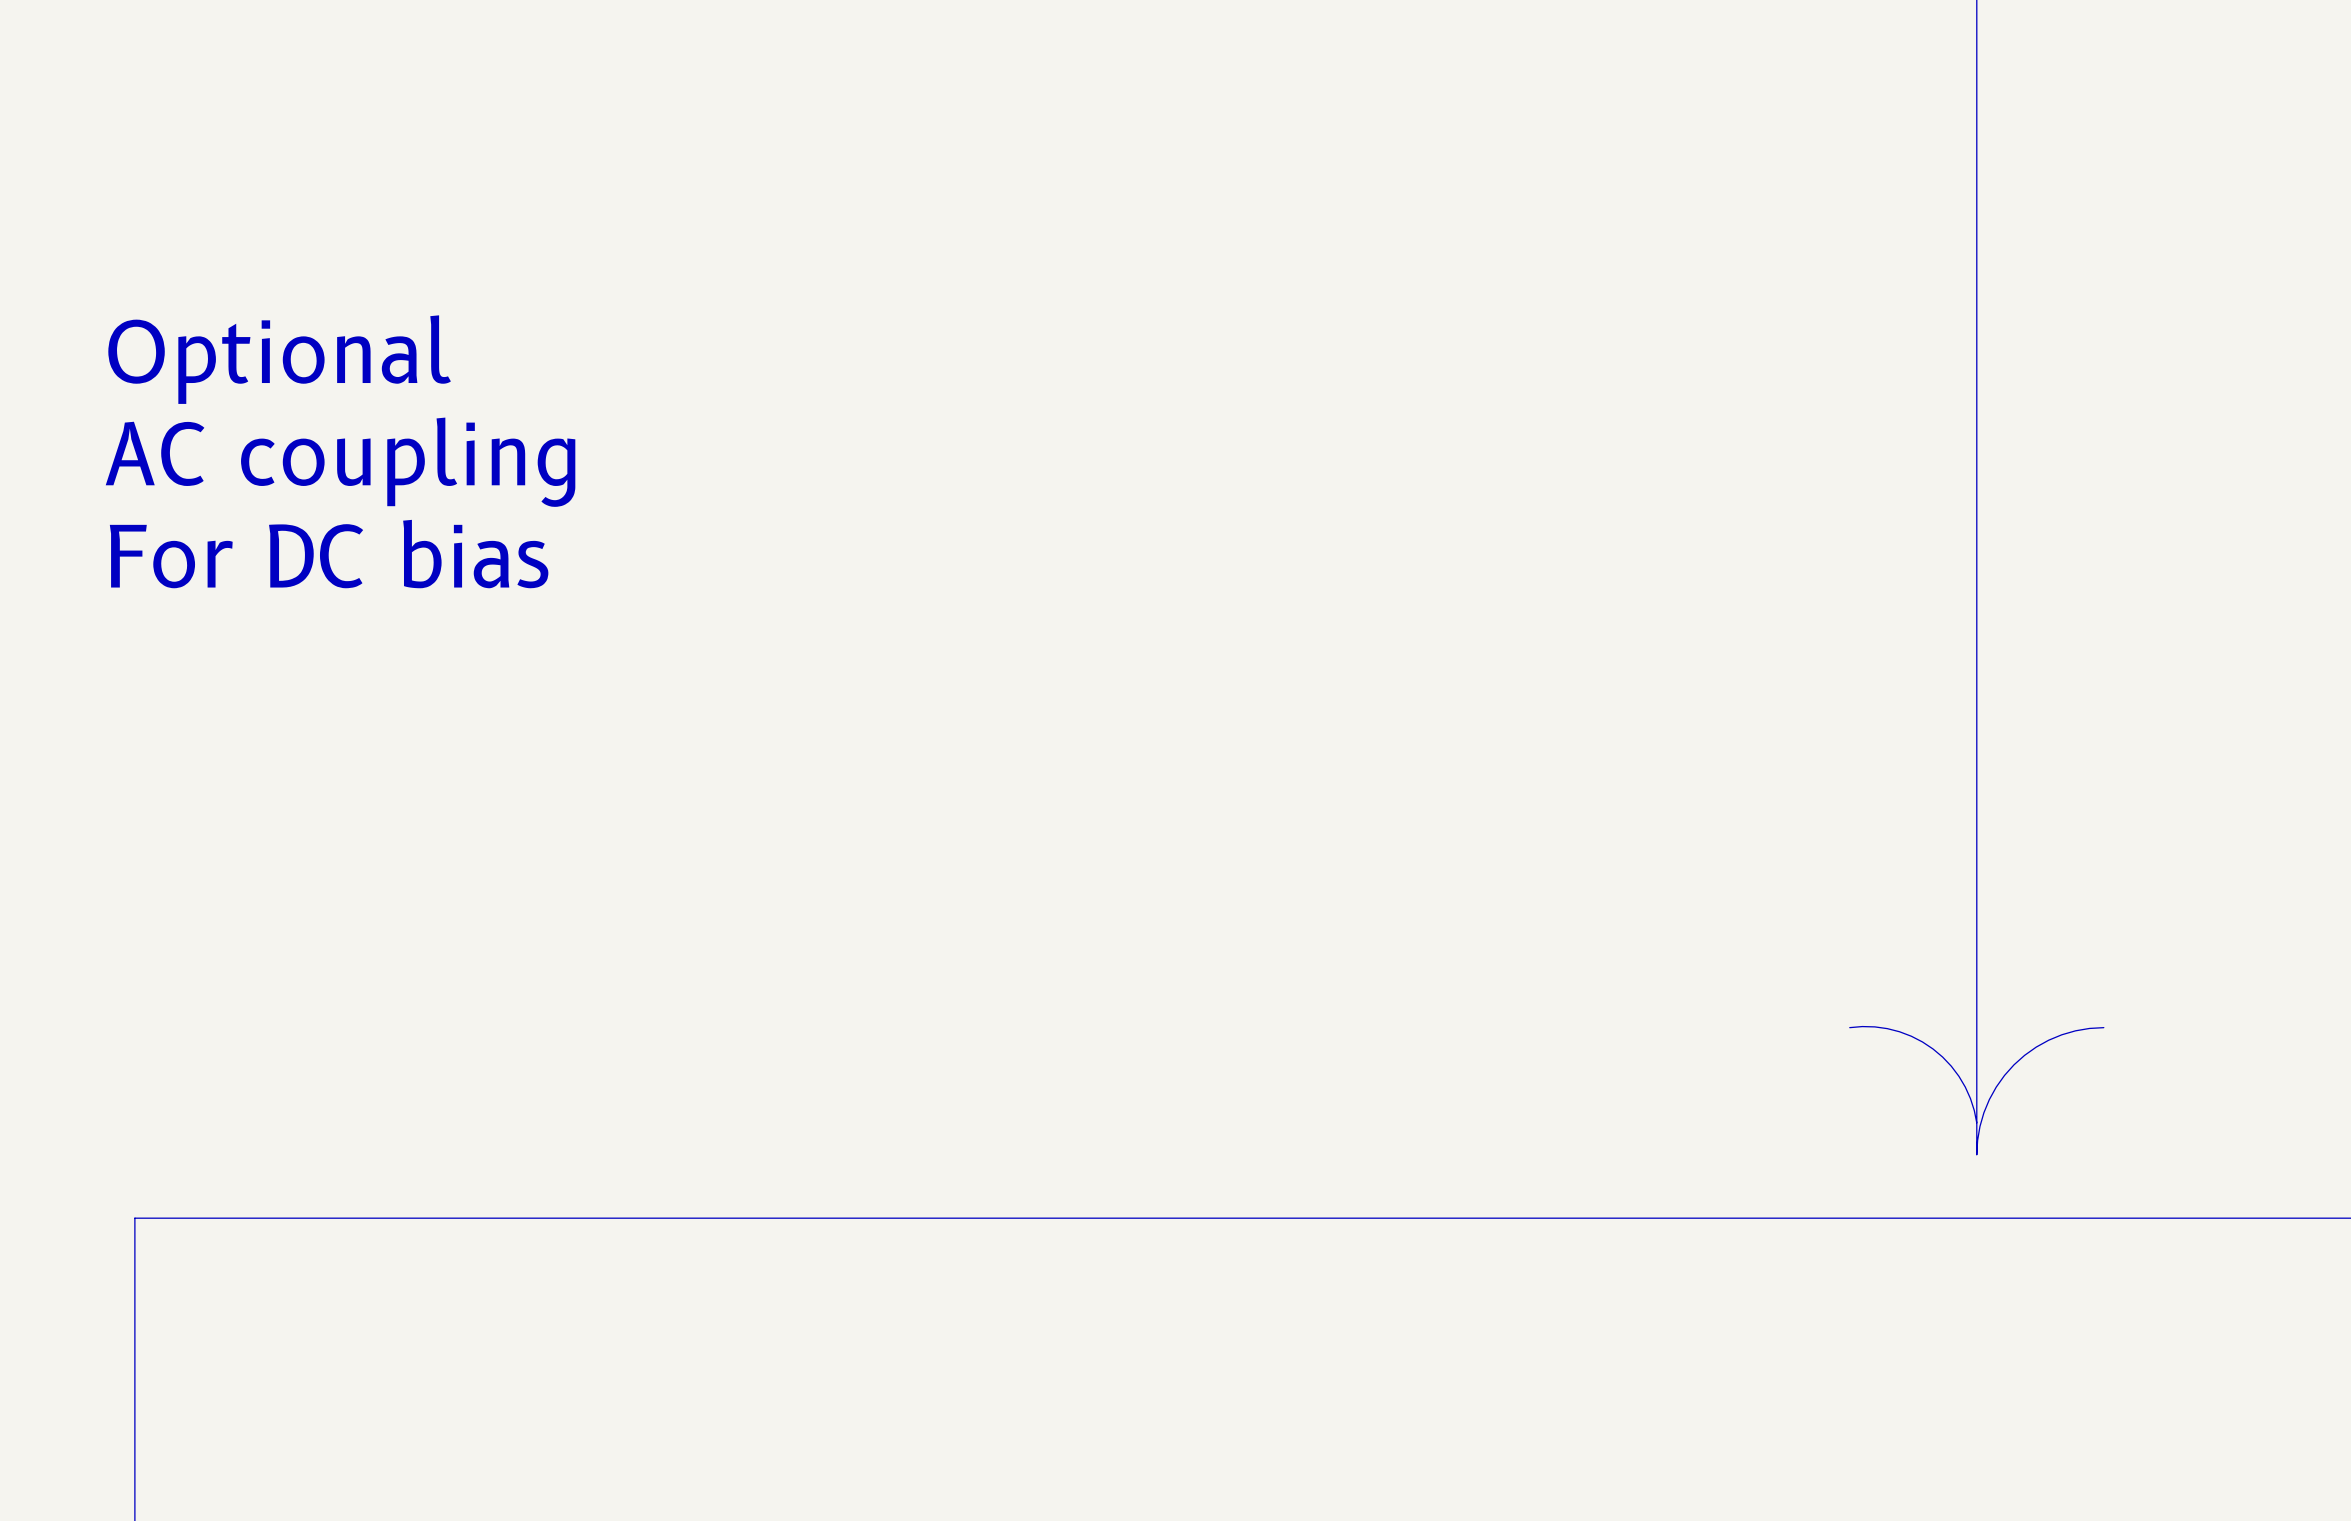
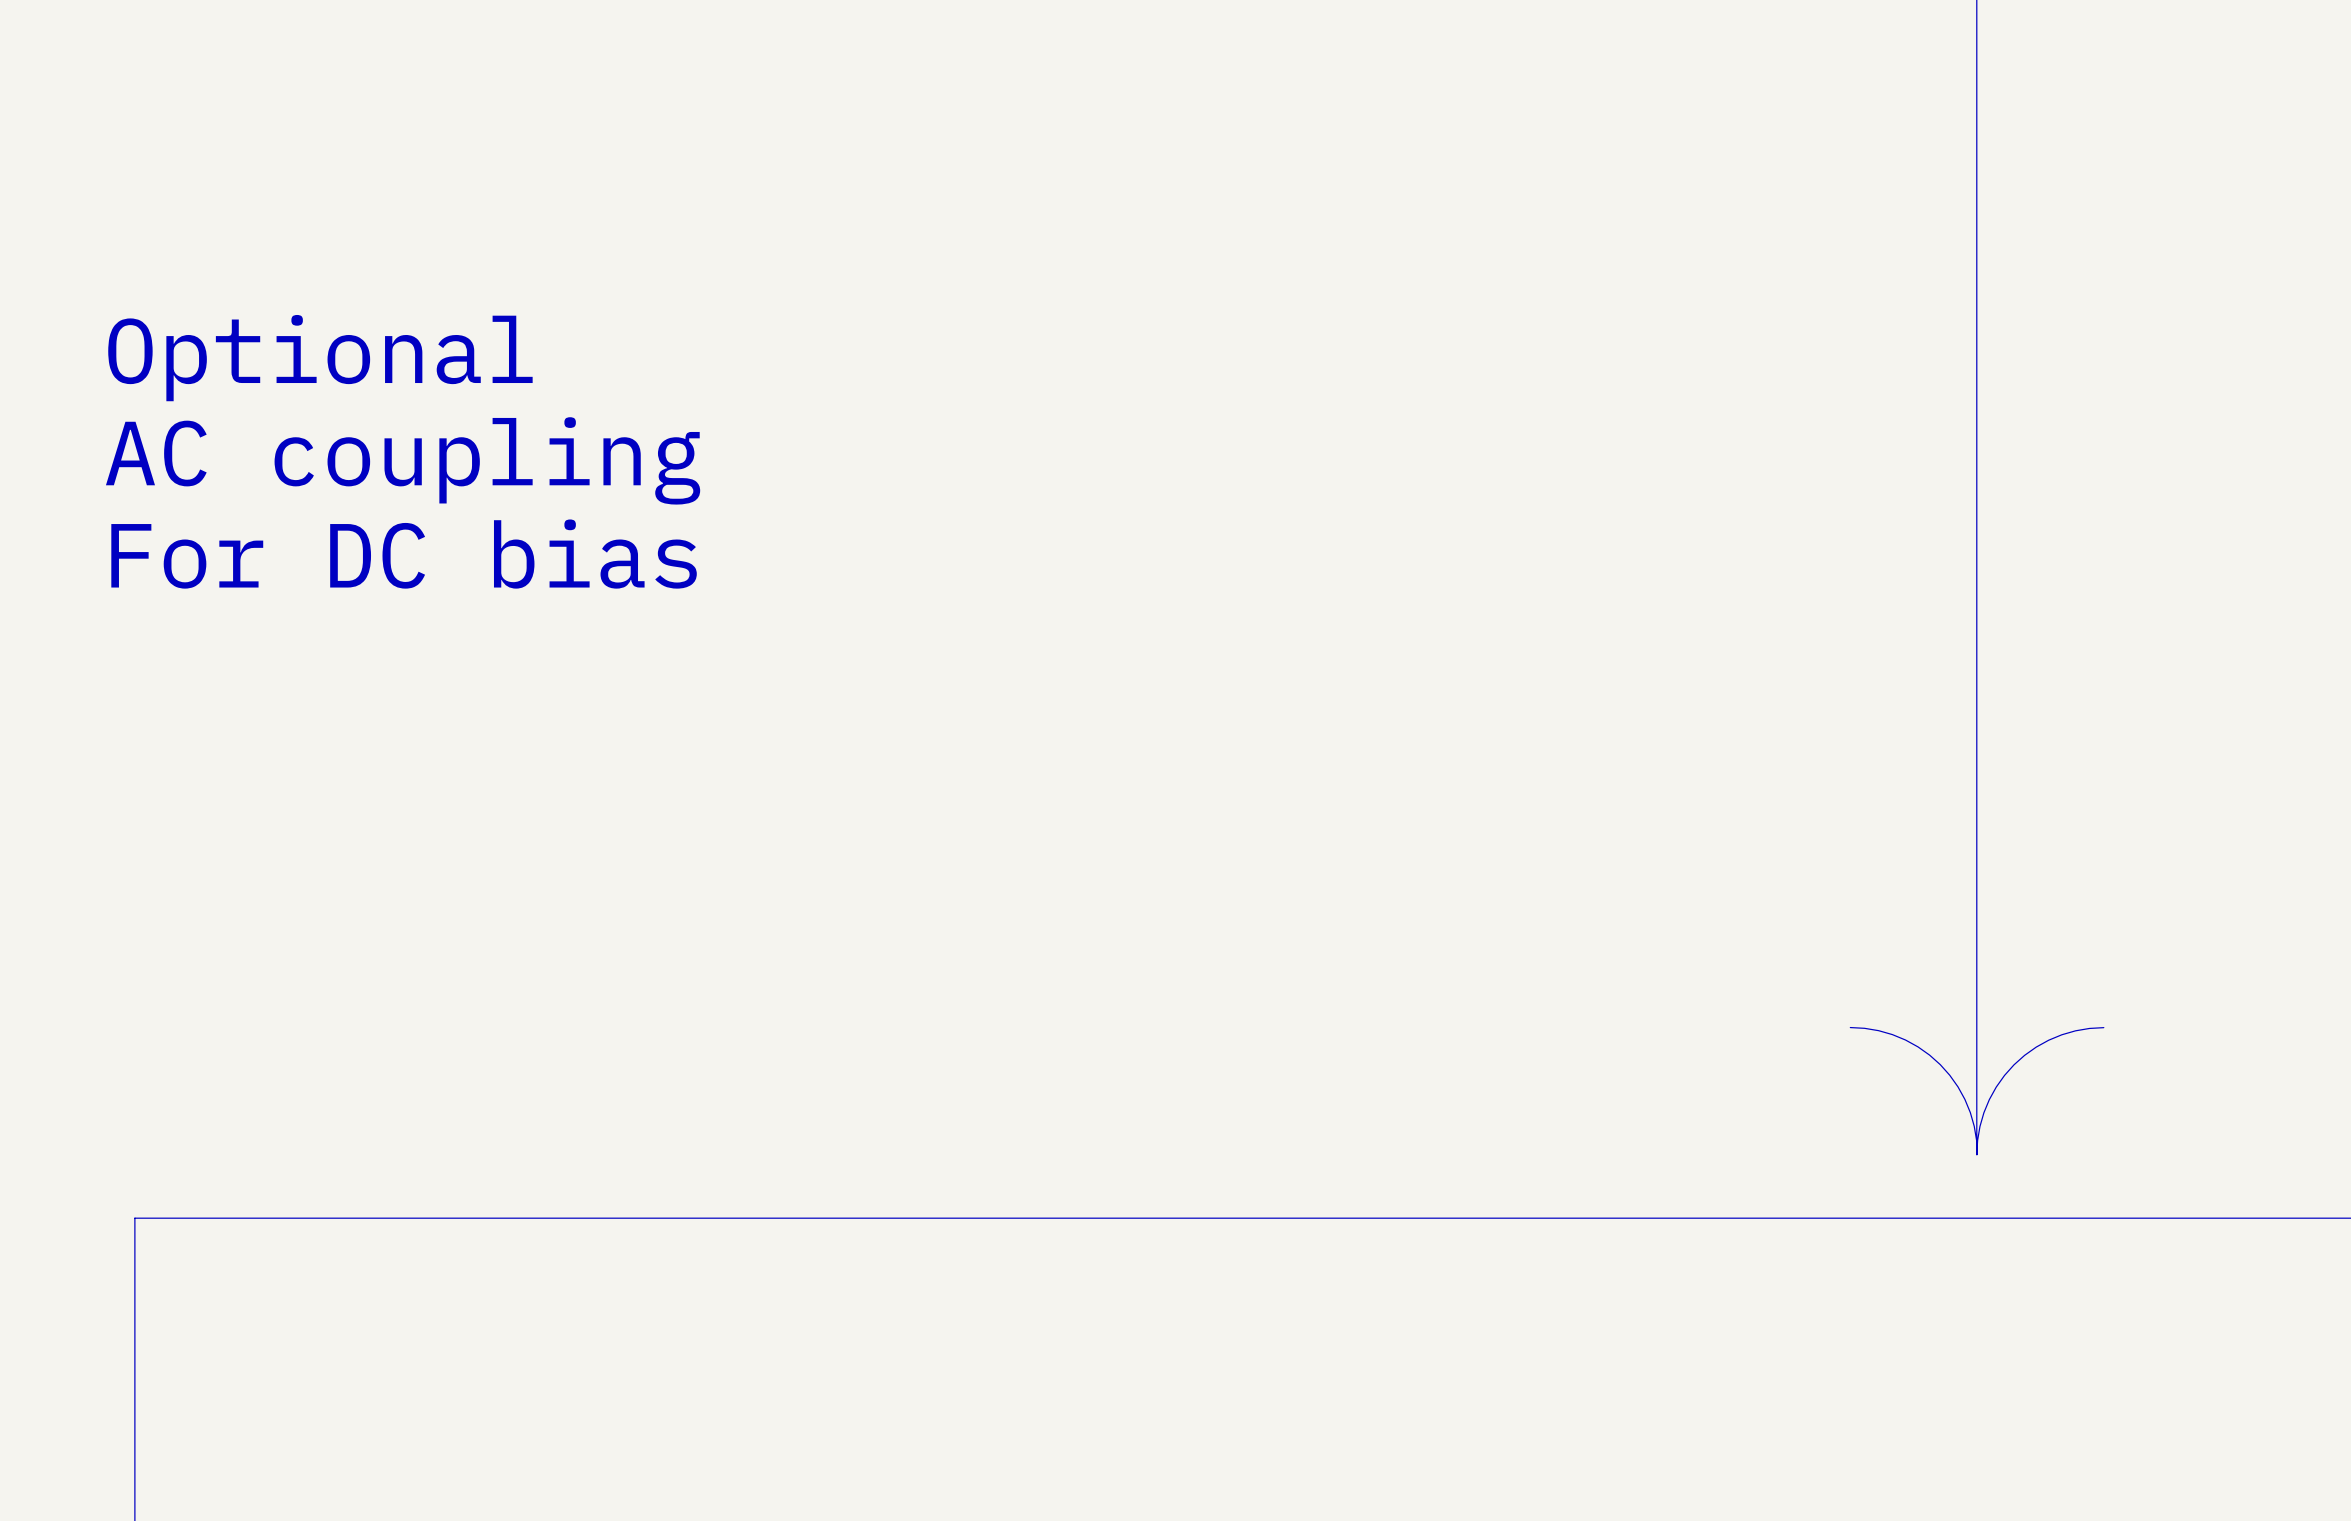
line: (1849, 1027) (1874, 1026) (1899, 1031) (1933, 1048) (1951, 1066) (1965, 1087) (1976, 1122) -> (1850, 1027) (1878, 1030) (1905, 1040) (1929, 1055) (1940, 1064) (1958, 1086) (1970, 1112) (1976, 1140) (1977, 1154)

